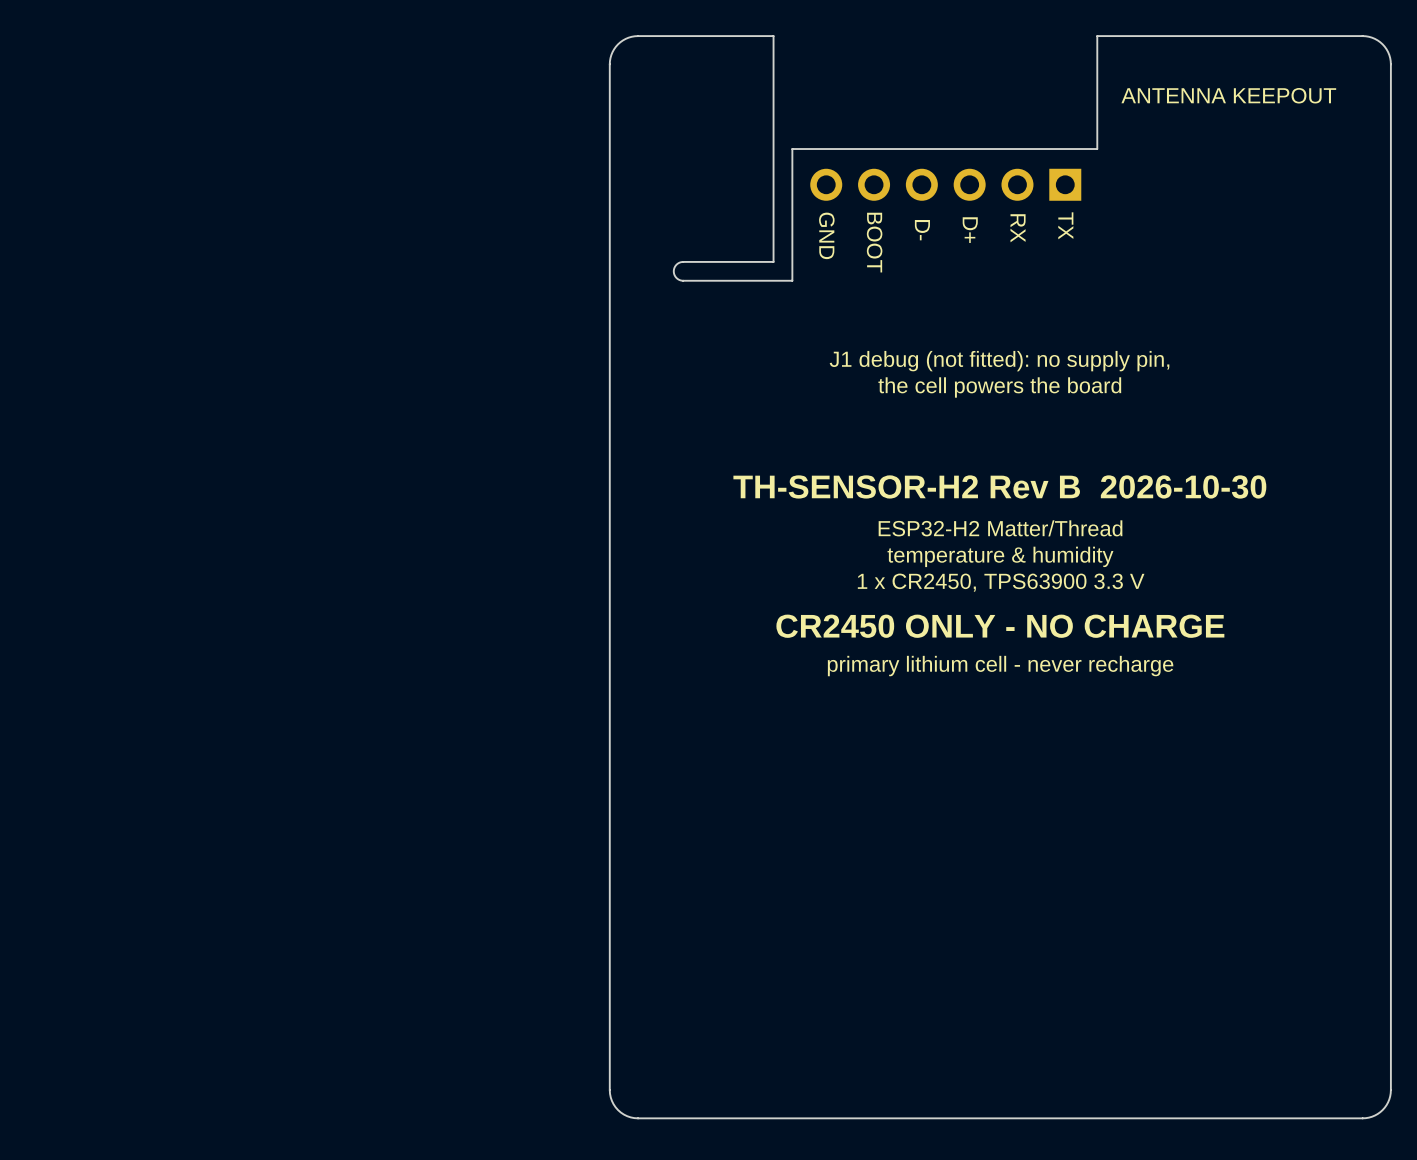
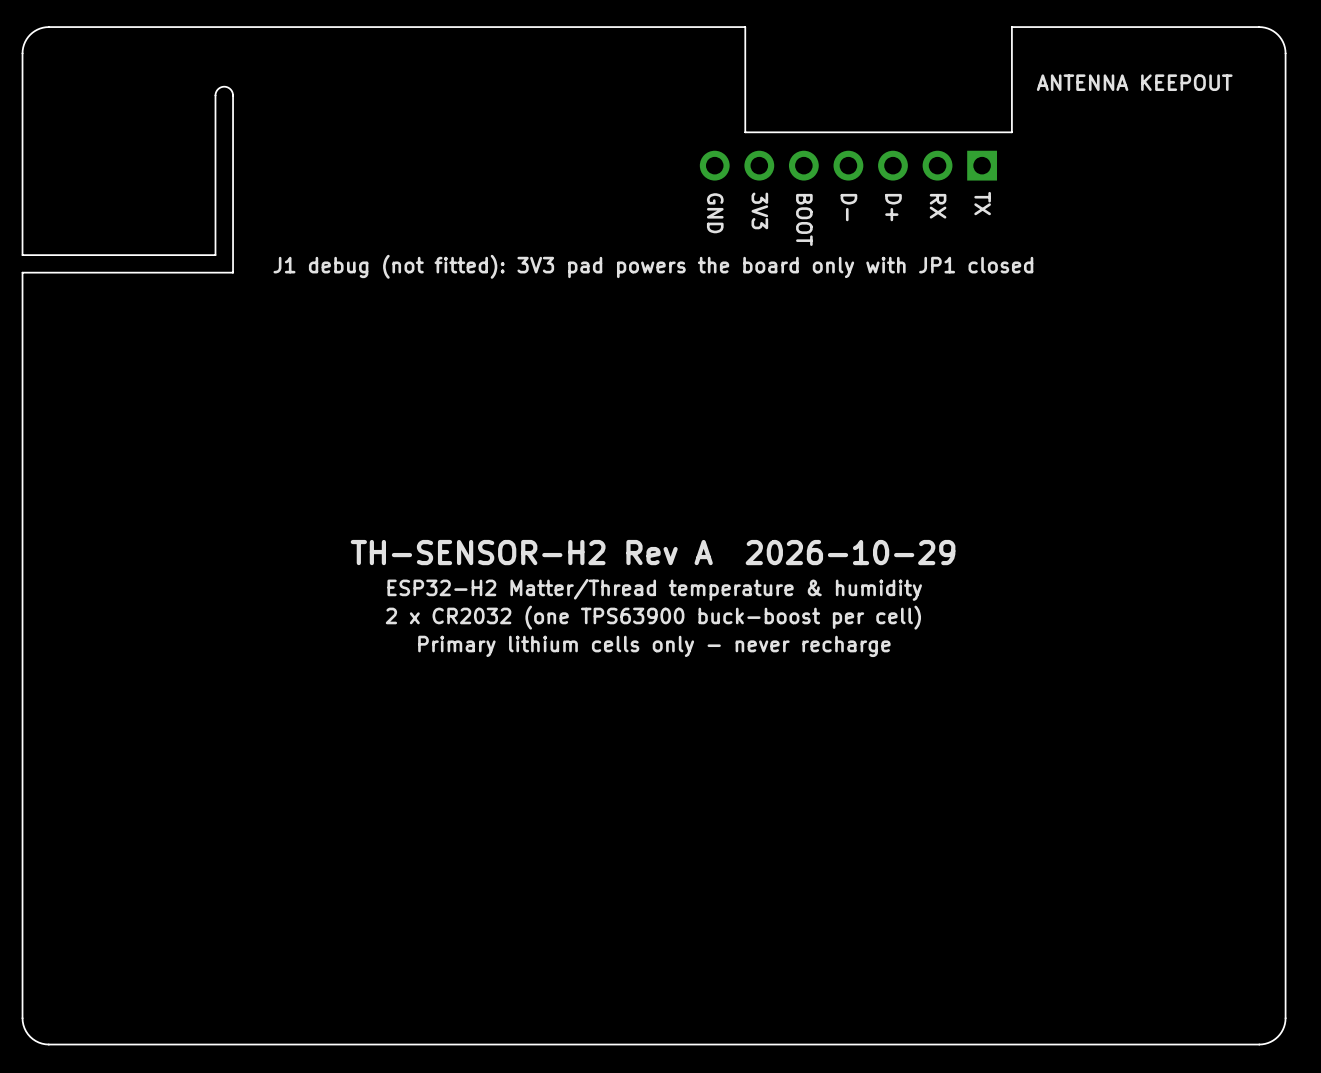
board edge: (638, 36) (625, 38) (618, 44) (612, 52) (609, 64) (609, 1090) (615, 1107) (623, 1114) (638, 1118) (1362, 1118) (1372, 1116) (1382, 1110) (1389, 1099) (1390, 1090) -> (583, 27) (48, 27) (34, 31) (25, 41) (22, 53) (22, 255) (215, 255) (215, 94) (219, 88) (225, 86) (230, 89) (233, 95) (233, 272) (22, 272) (22, 1018) (27, 1034) (38, 1042) (48, 1044) (1259, 1044) (1270, 1041) (1279, 1034) (1284, 1024) (1285, 1009)
board edge: (773, 36) (773, 261) (681, 262) (674, 267) (674, 273) (676, 278) (683, 280) (792, 280) (792, 149) (811, 149) -> (710, 27) (745, 27) (745, 132)
part: none -> (848, 165)
text: none -> 3V3 (759, 210)
text position: GND (826, 235) -> GND (715, 213)
text: none -> J1 debug (not fitted): 3V3 pad powers the board only with JP1 closed (653, 266)
text: J1 debug (not fitted): no supply pin, (999, 361) -> none
text: the cell powers the board (999, 387) -> none
text: TH-SENSOR-H2 Rev B 2026-10-30 (999, 486) -> none
text: ESP32-H2 Matter/Thread (1000, 528) -> none
text: temperature & humidity (1000, 556) -> none
text: 1 x CR2450, TPS63900 3.3 V (1001, 582) -> none
text: none -> TH-SENSOR-H2 Rev A 2026-10-29 (653, 552)
text: CR2450 ONLY - NO CHARGE (1000, 626) -> none
text: none -> ESP32-H2 Matter/Thread temperature & humidity (654, 589)
text: primary lithium cell - never recharge (1000, 666) -> none
text: none -> 2 x CR2032 (one TPS63900 buck-boost per cell) (653, 617)
text: none -> Primary lithium cells only - never recharge (654, 646)

